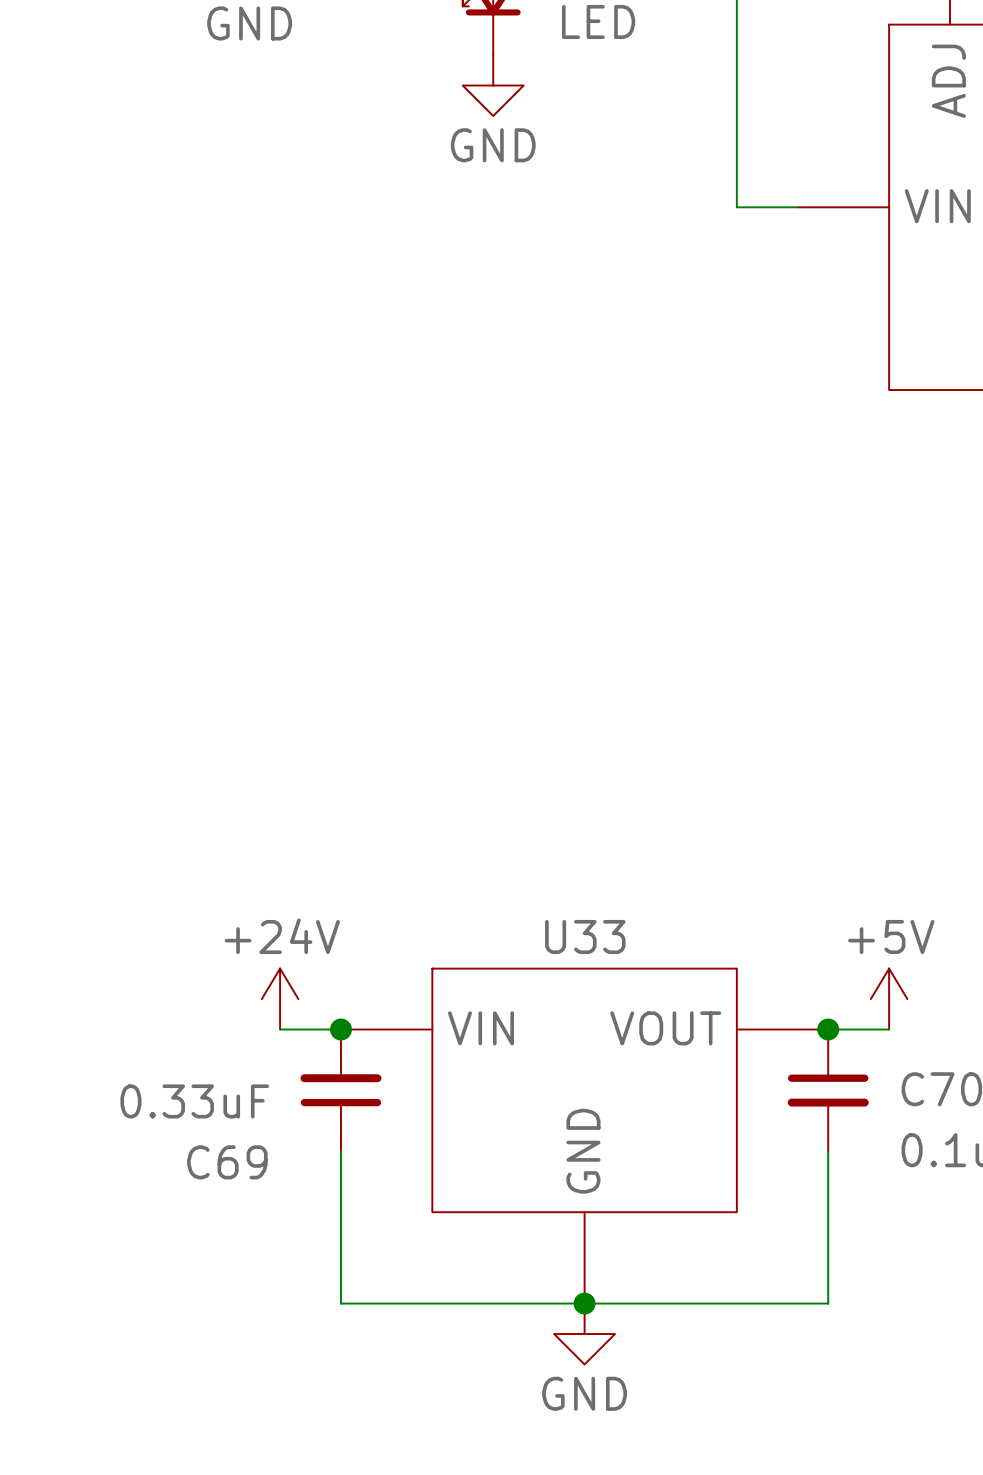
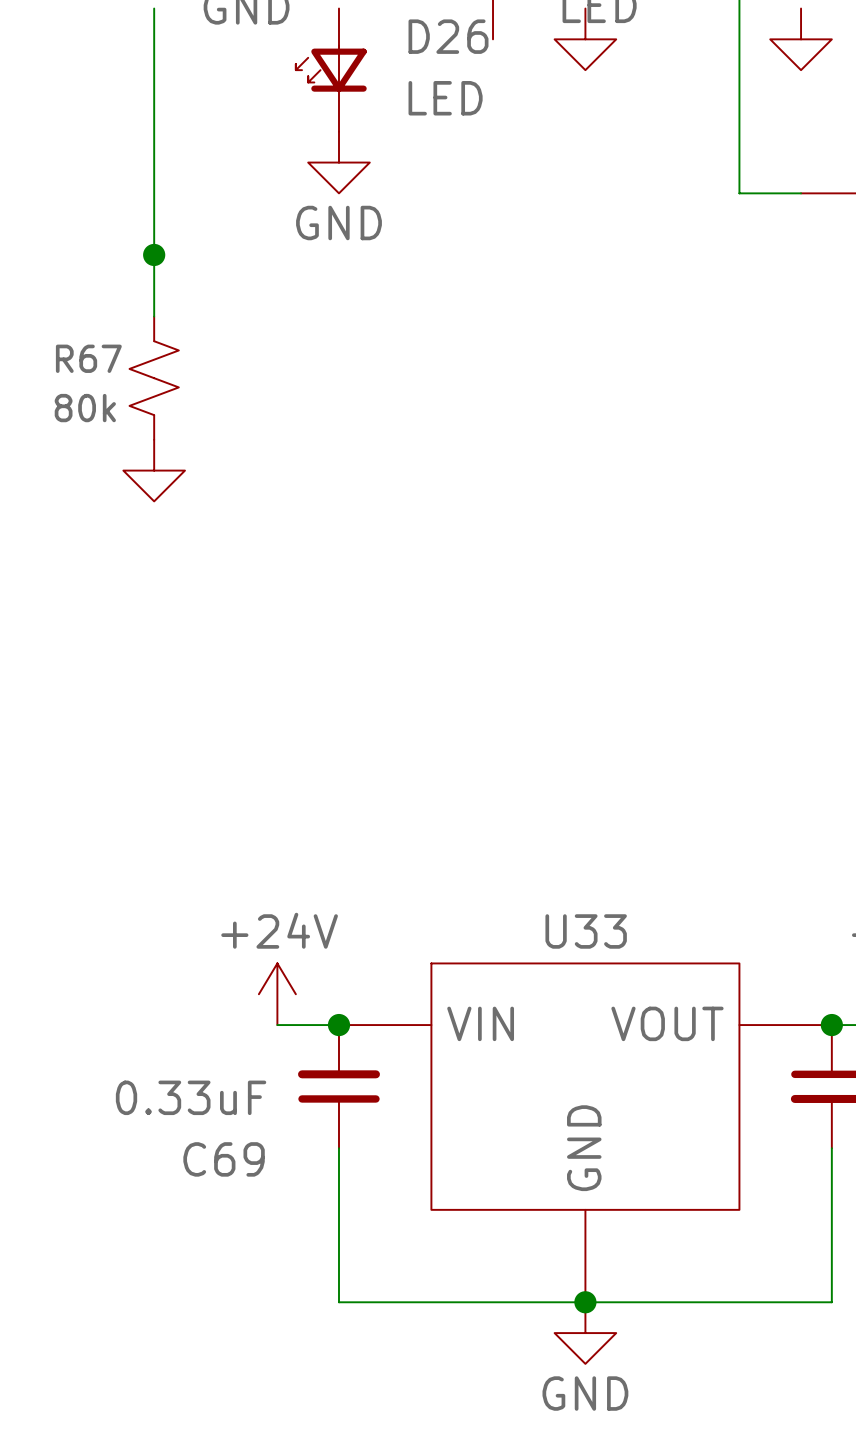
wire: none -> (154, 8) (154, 316)
power symbol: none -> (585, 39)
power symbol: none -> (801, 39)
D26: none -> LED (331, 70)
power symbol position: GND (493, 85) -> GND (338, 162)
junction: none -> (154, 254)
R67: none -> 80k (154, 378)
power symbol: none -> (154, 470)

